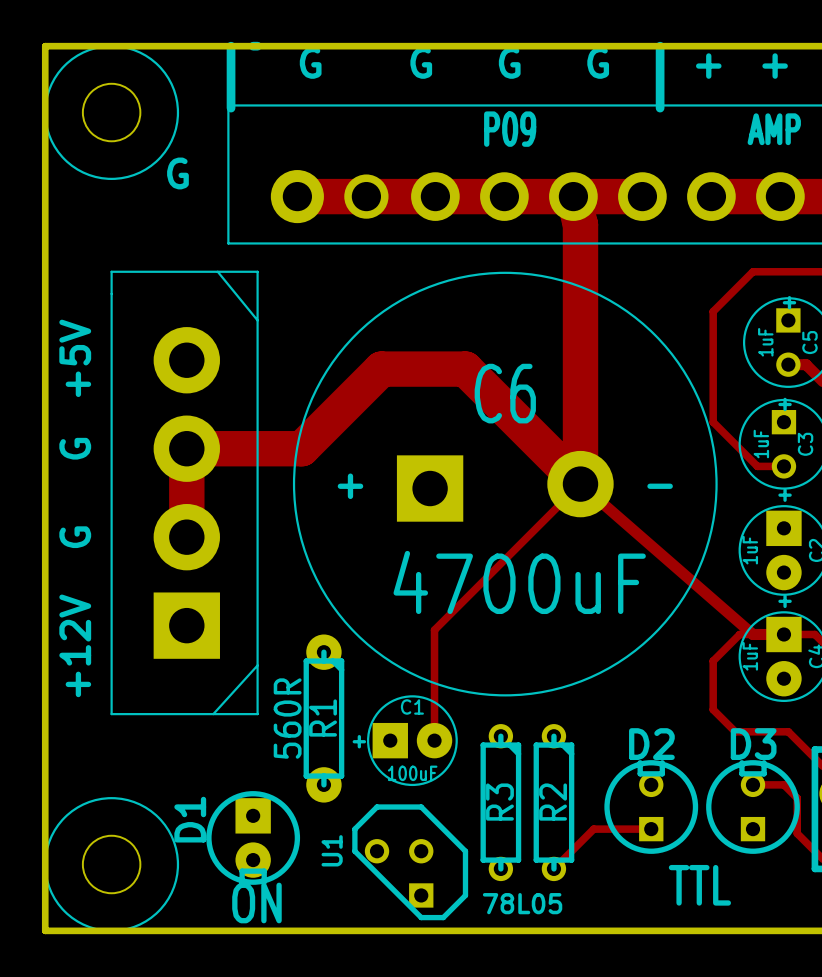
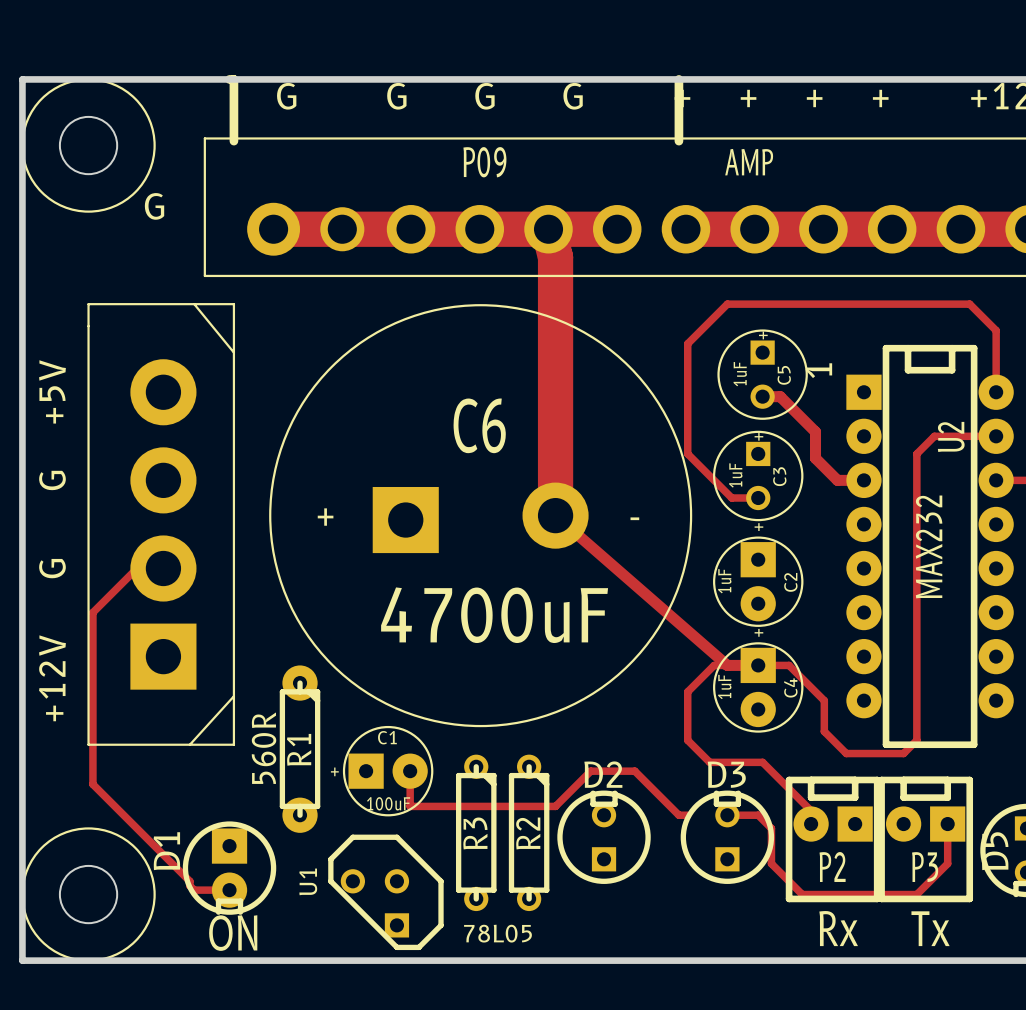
line: (231, 46) (231, 108) -> (233, 79) (233, 141)
line: (660, 46) (660, 108) -> (678, 79) (678, 141)
track: (186, 537) (186, 448) (301, 448) (381, 369) (465, 369) (580, 484) (434, 630) (434, 740) -> (163, 568) (137, 568) (92, 612) (92, 784) (189, 881) (189, 885) (194, 890) (229, 890)
track: none -> (410, 771) (410, 806) (555, 806) (590, 771) (634, 771) (678, 815) (687, 815)
D2 position: (651, 807) -> (604, 837)
track: (651, 829) (593, 829) (553, 868) -> none
text: TTL (699, 885) -> none

